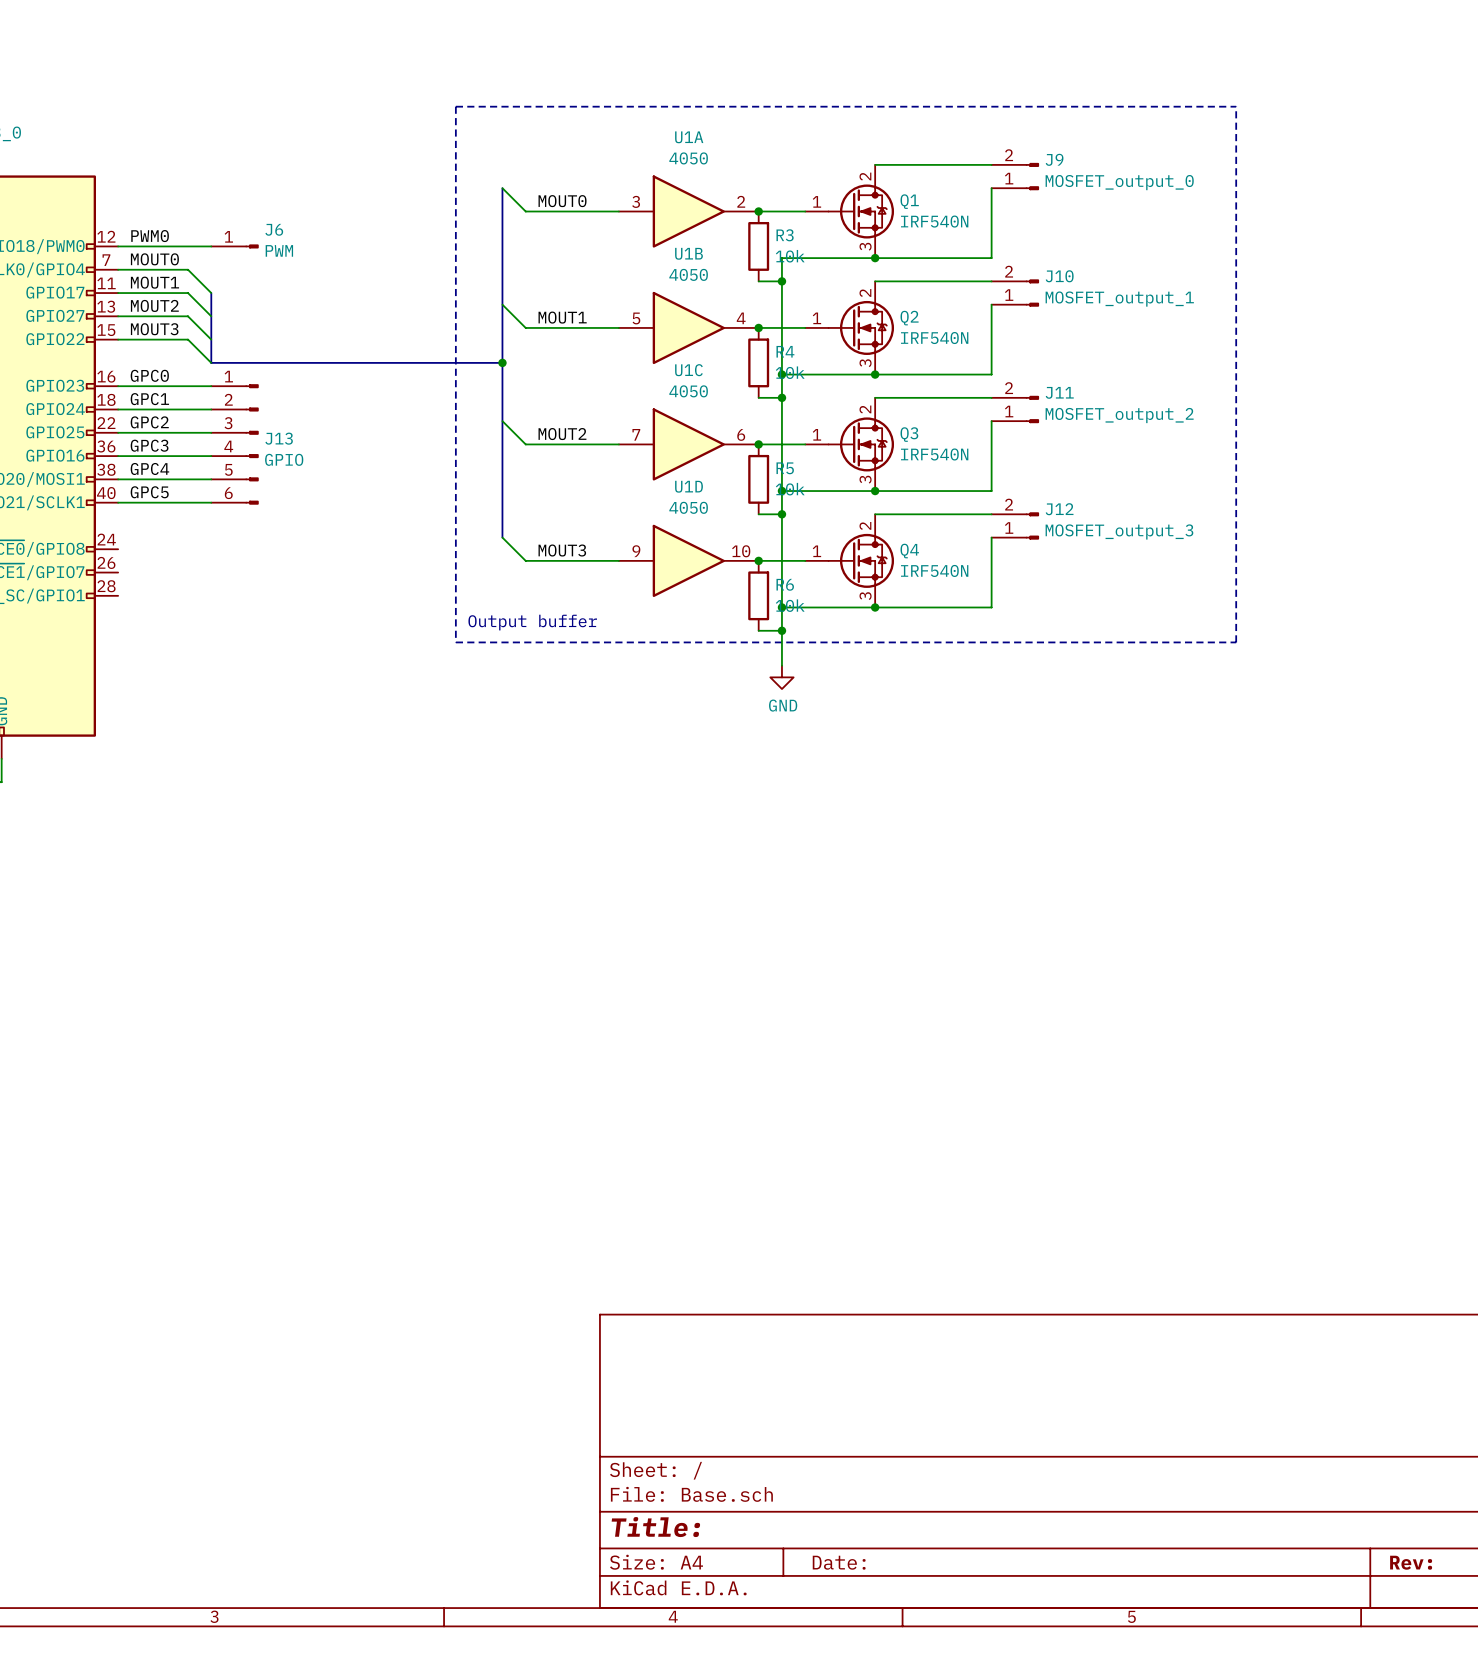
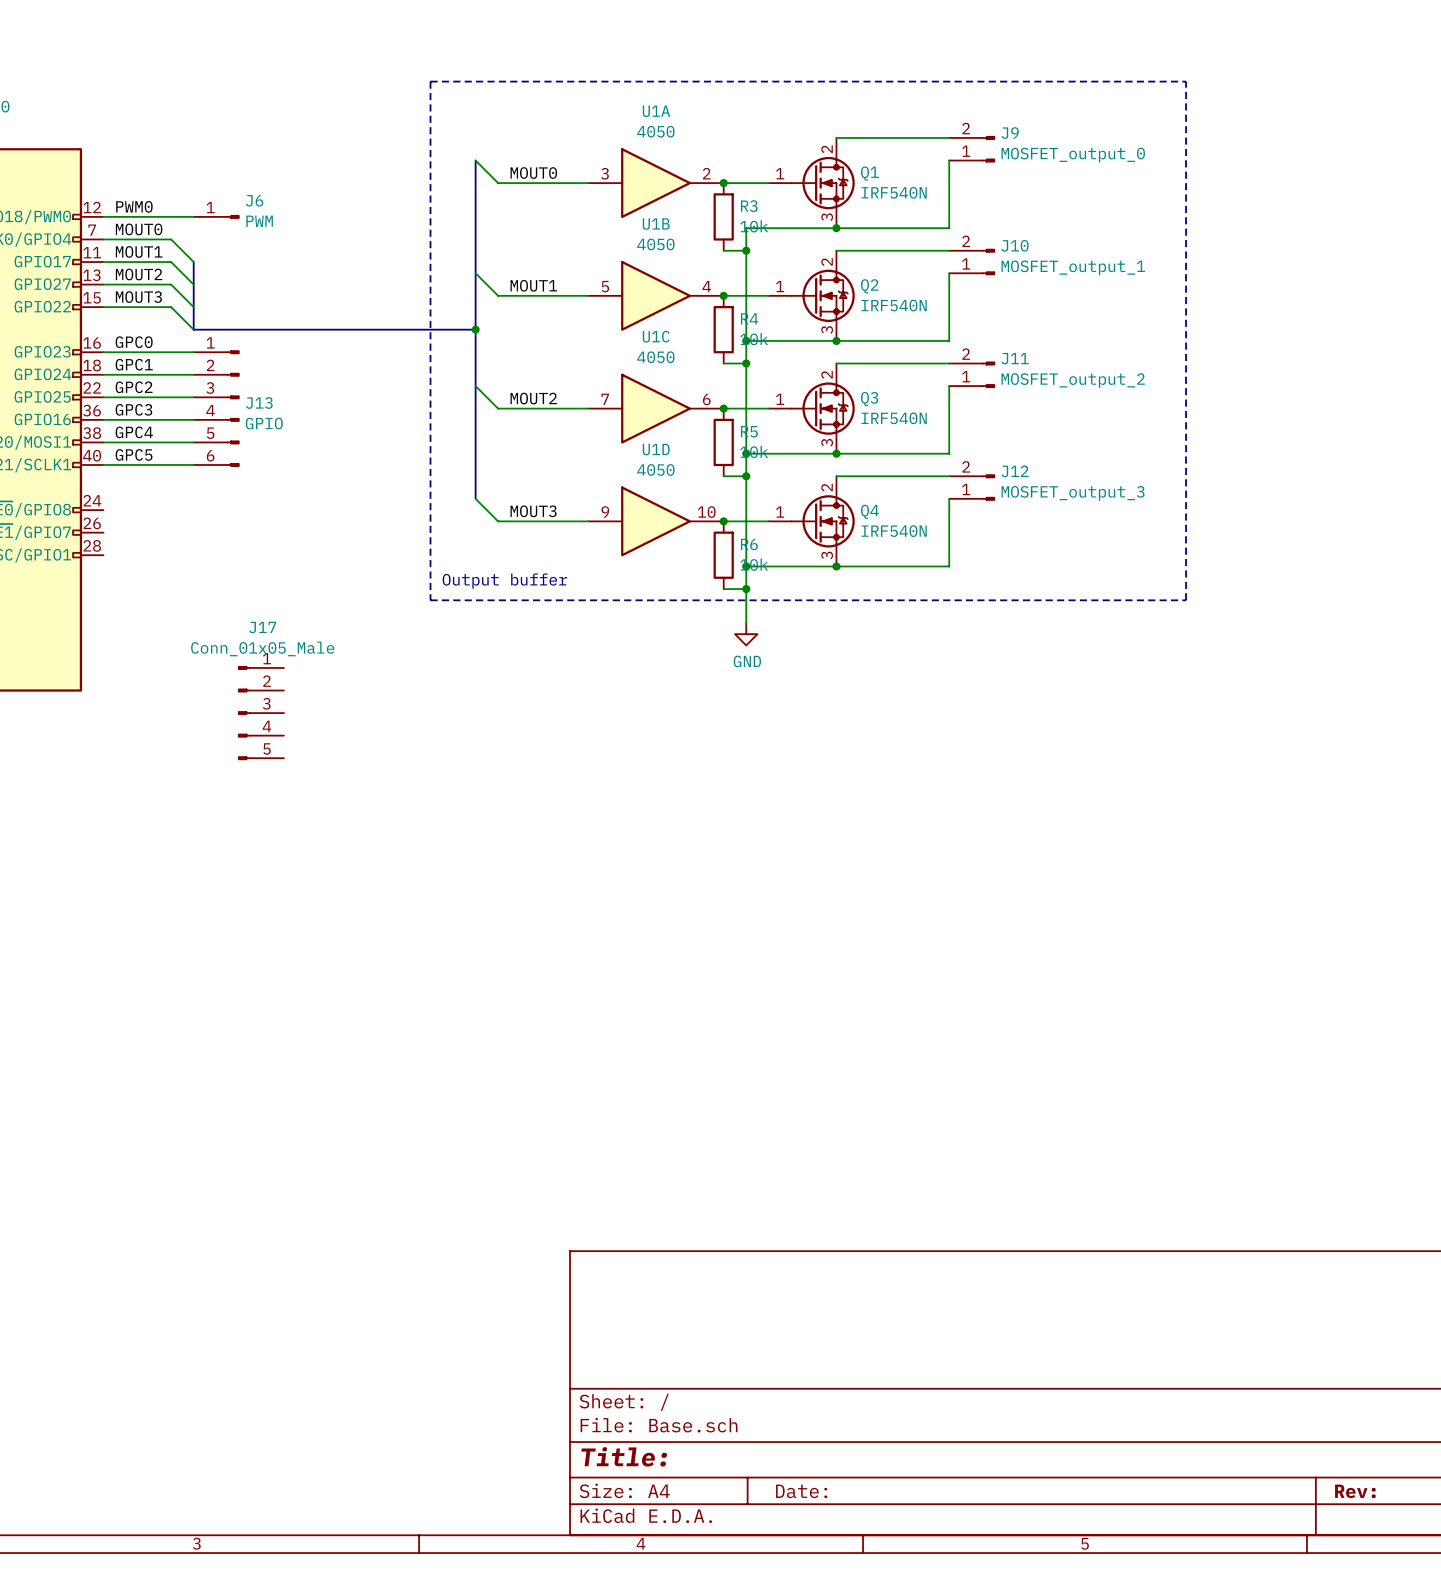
J17: none -> Conn_01x05_Male (261, 713)

